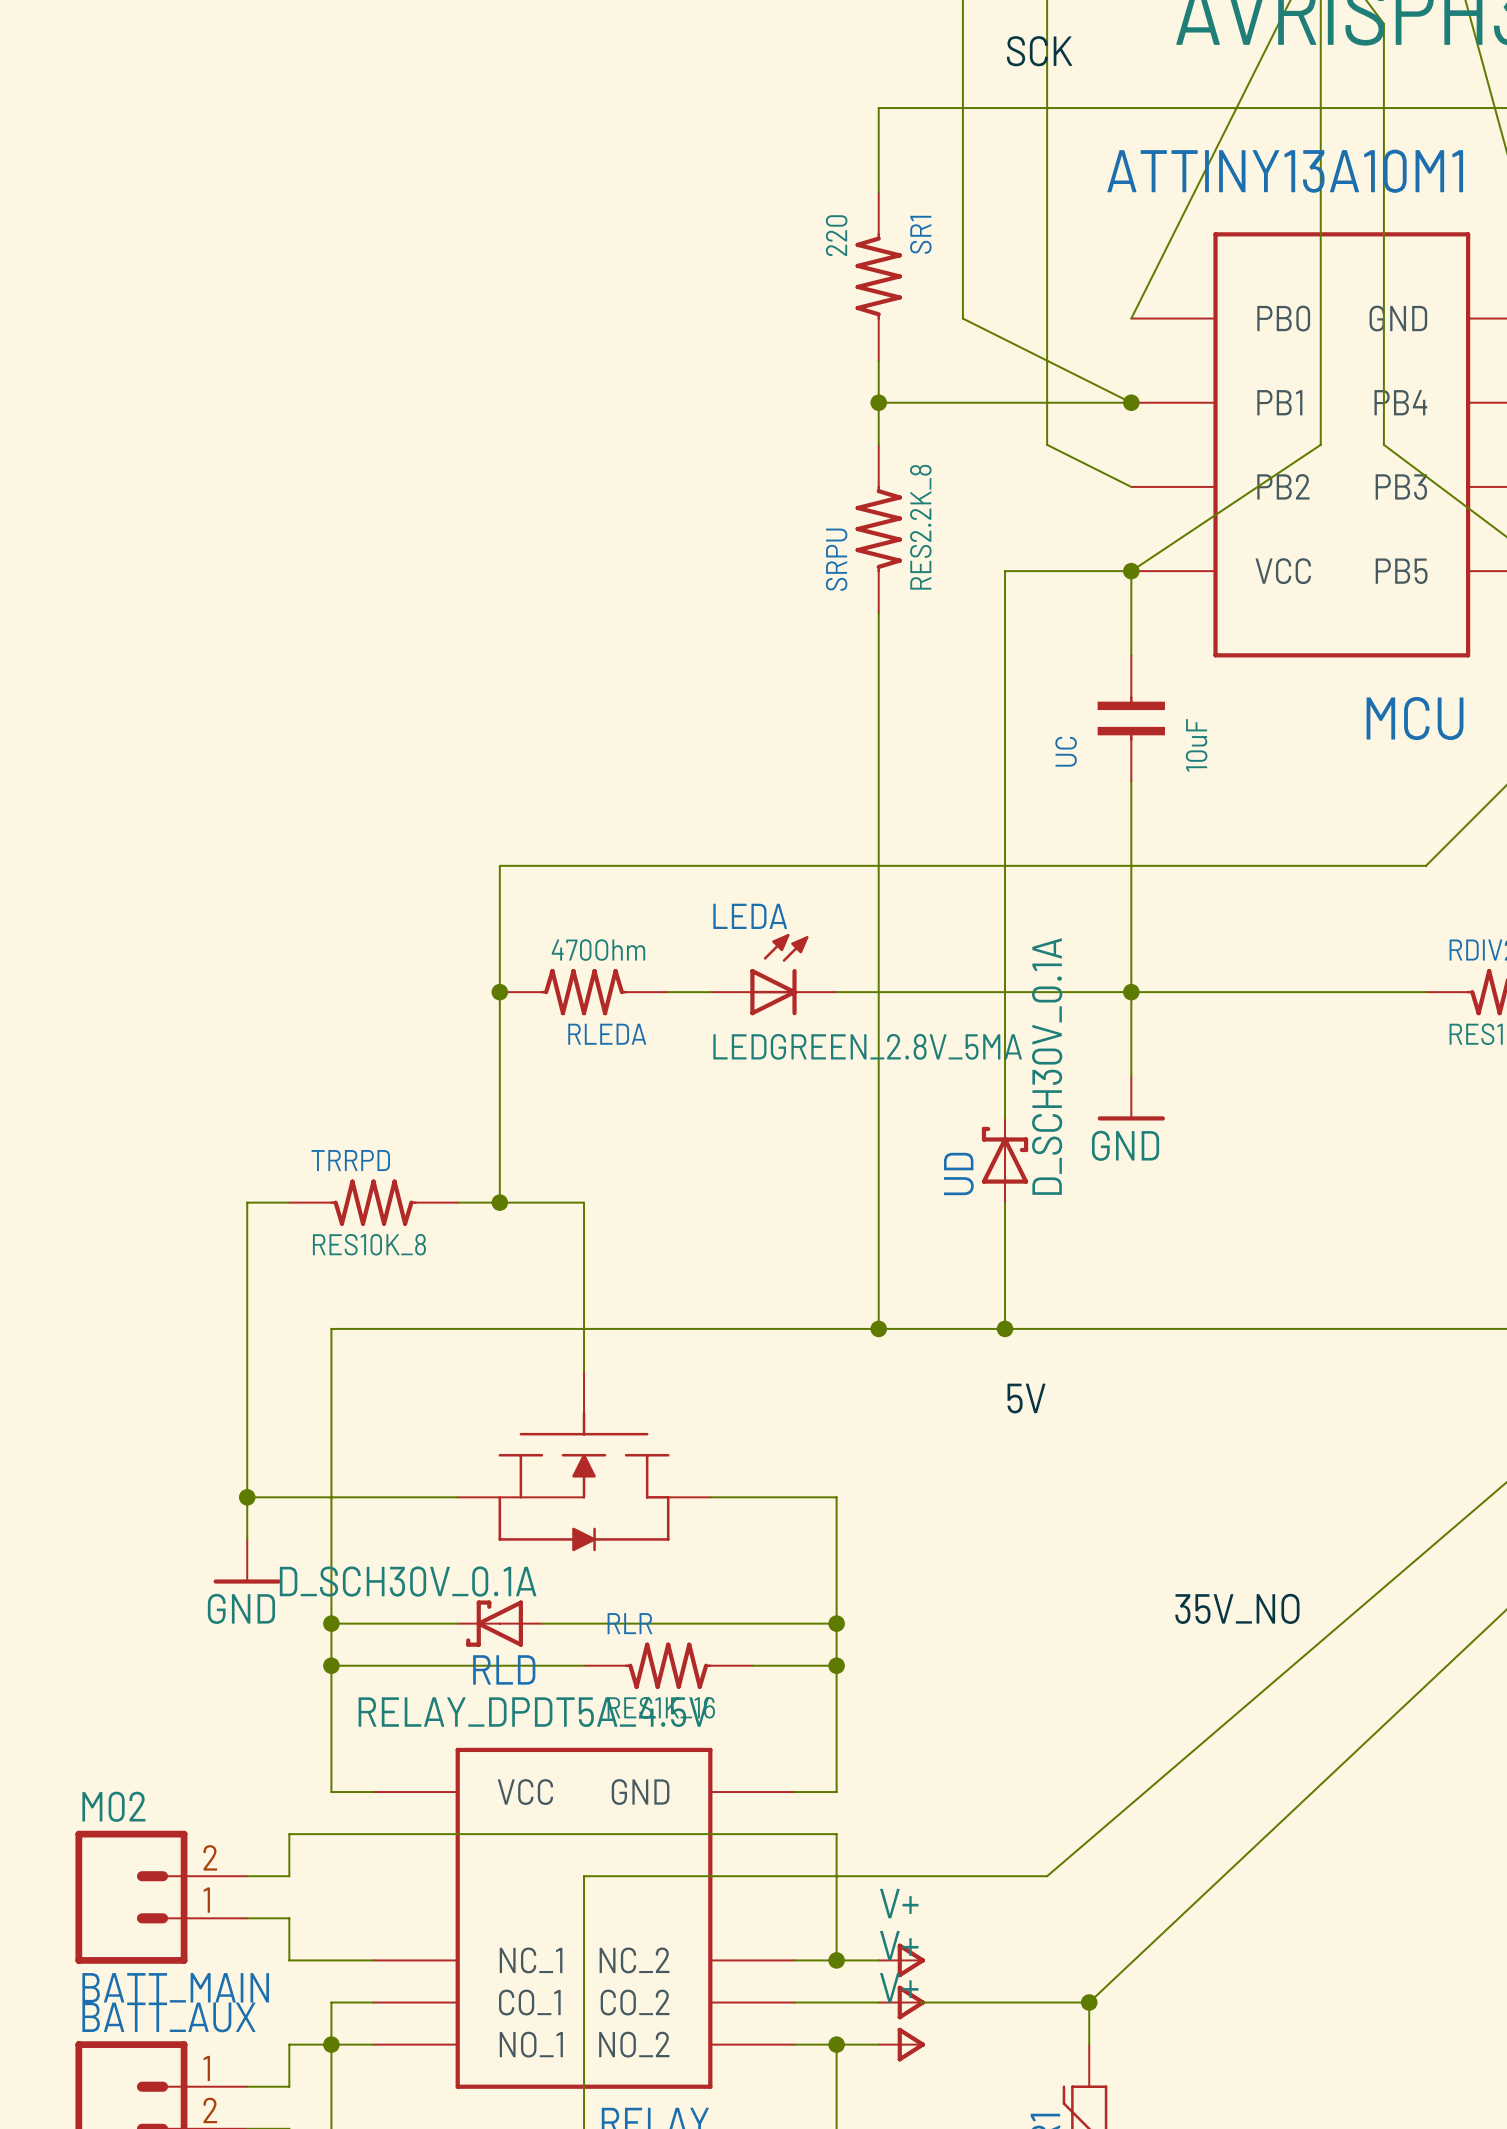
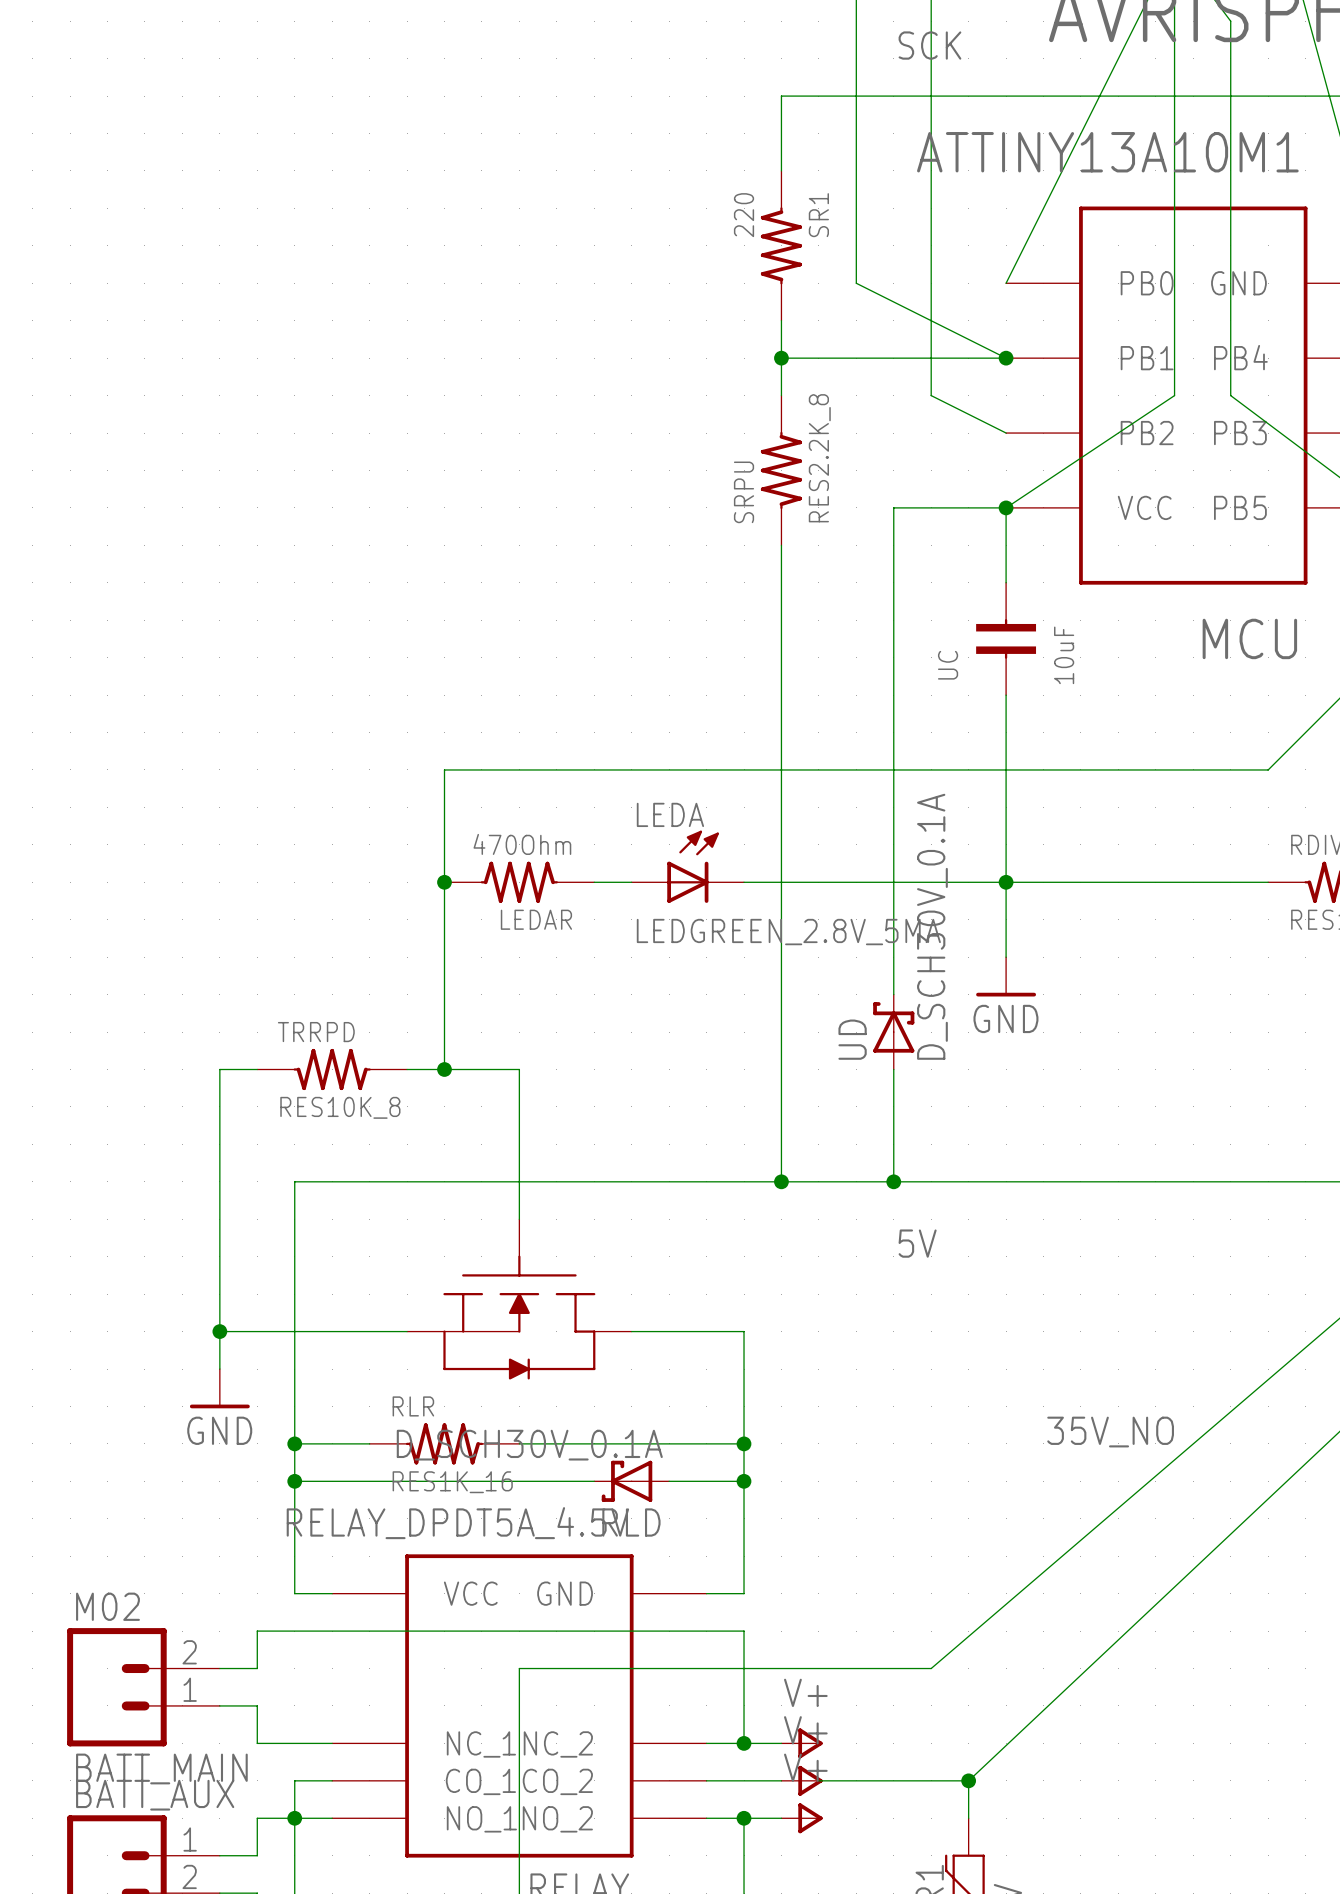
RLEDA name: RLEDA (607, 1034) -> LEDAR (536, 919)
RLD position: (499, 1623) -> (631, 1481)
RLR position: (668, 1665) -> (444, 1443)

